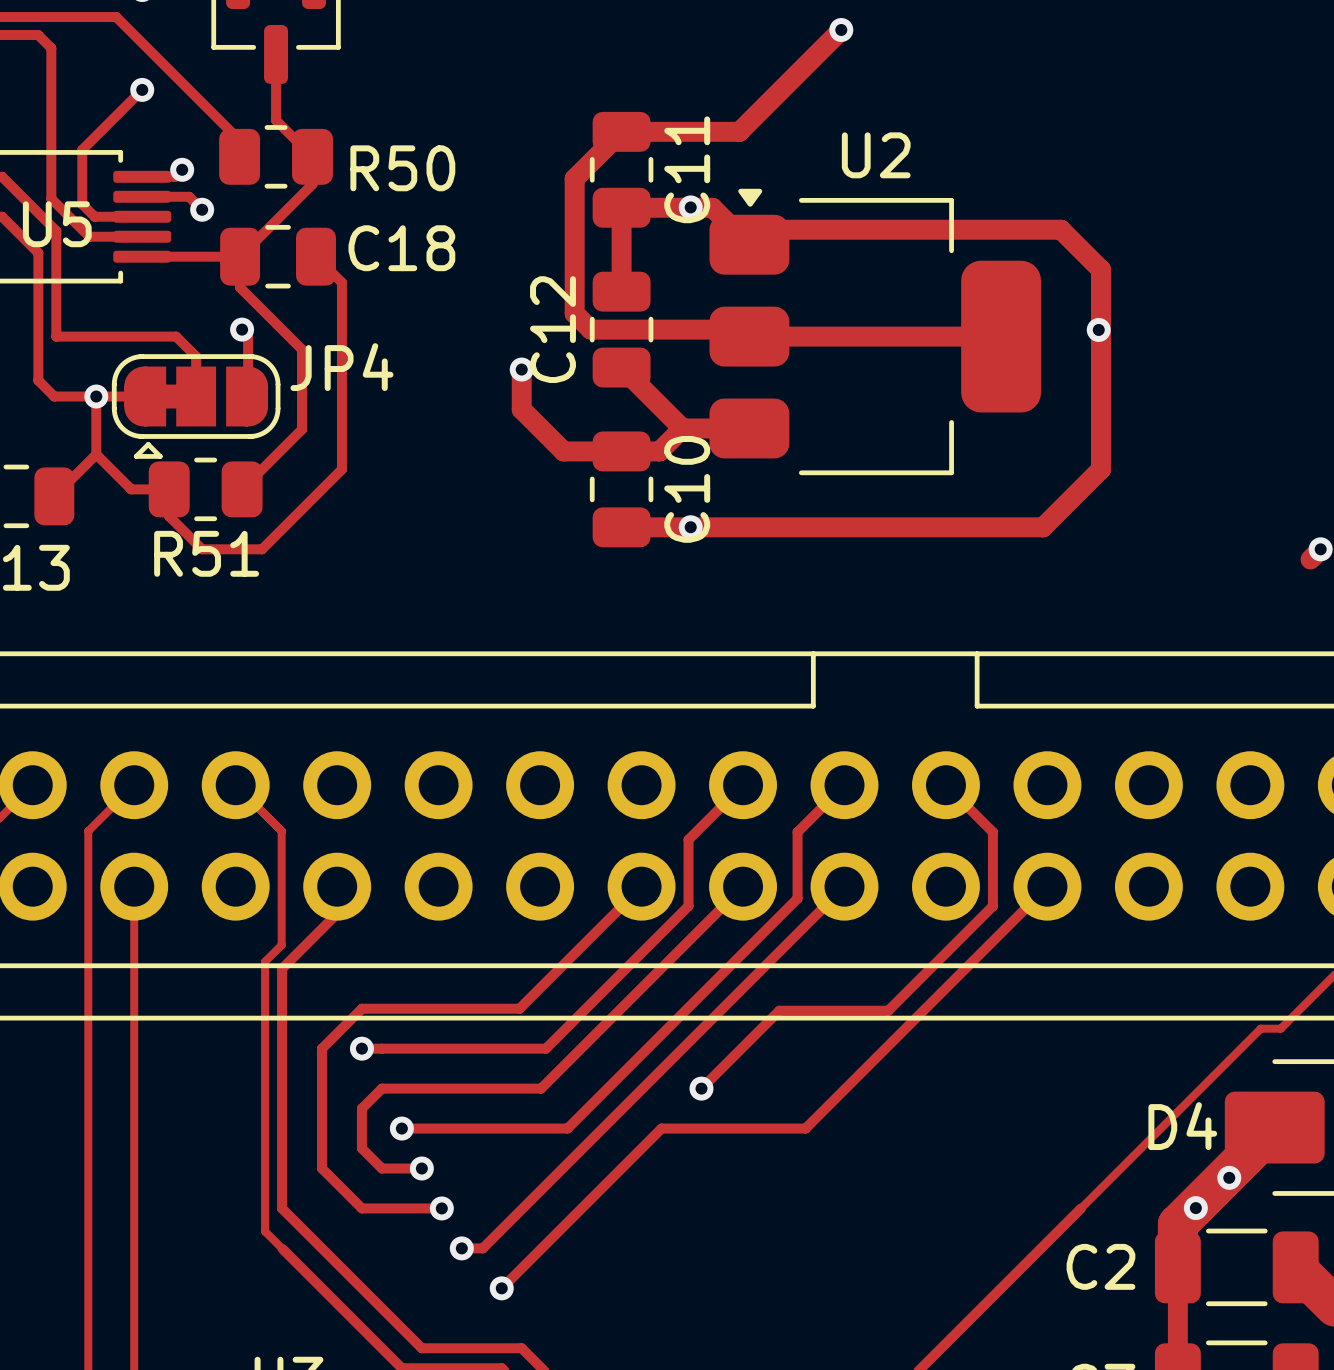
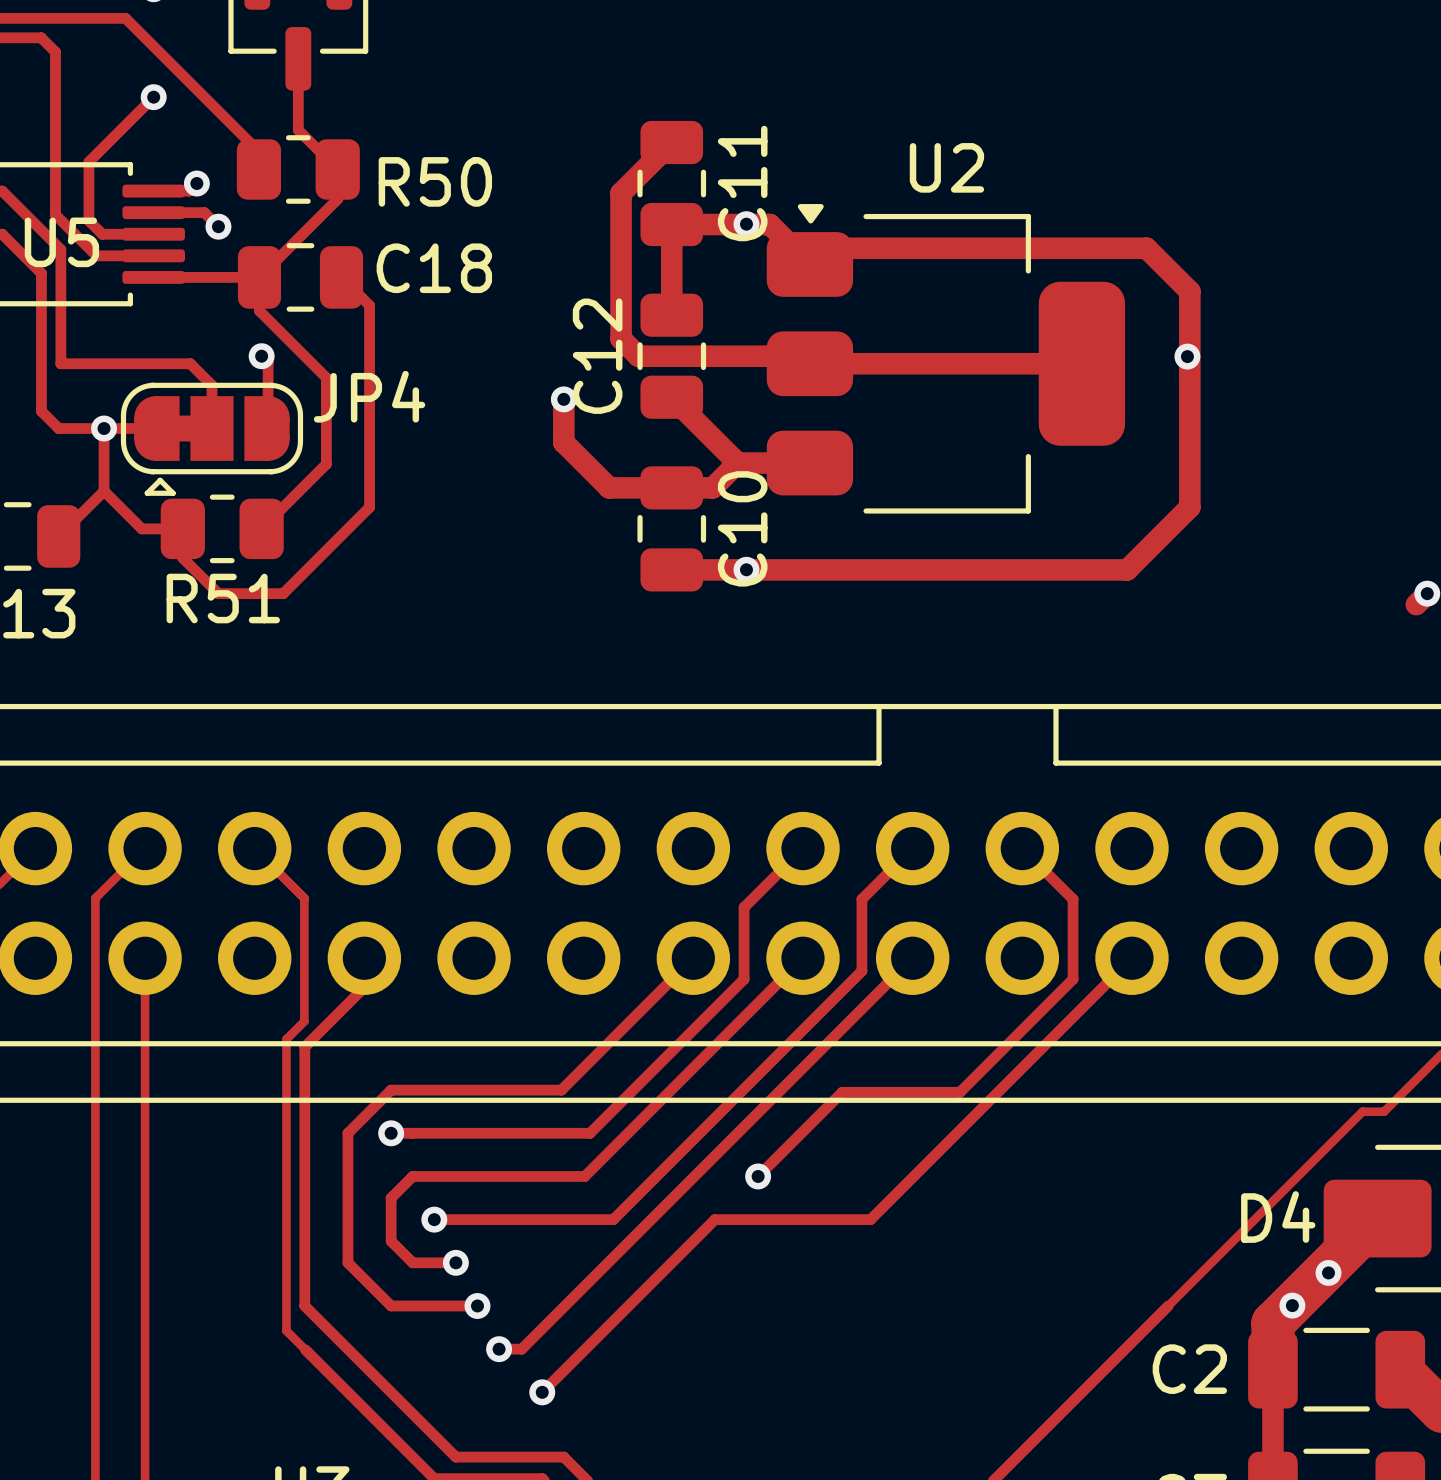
track: (841, 29) (739, 131) (621, 131) -> none
via: (841, 29) -> none

